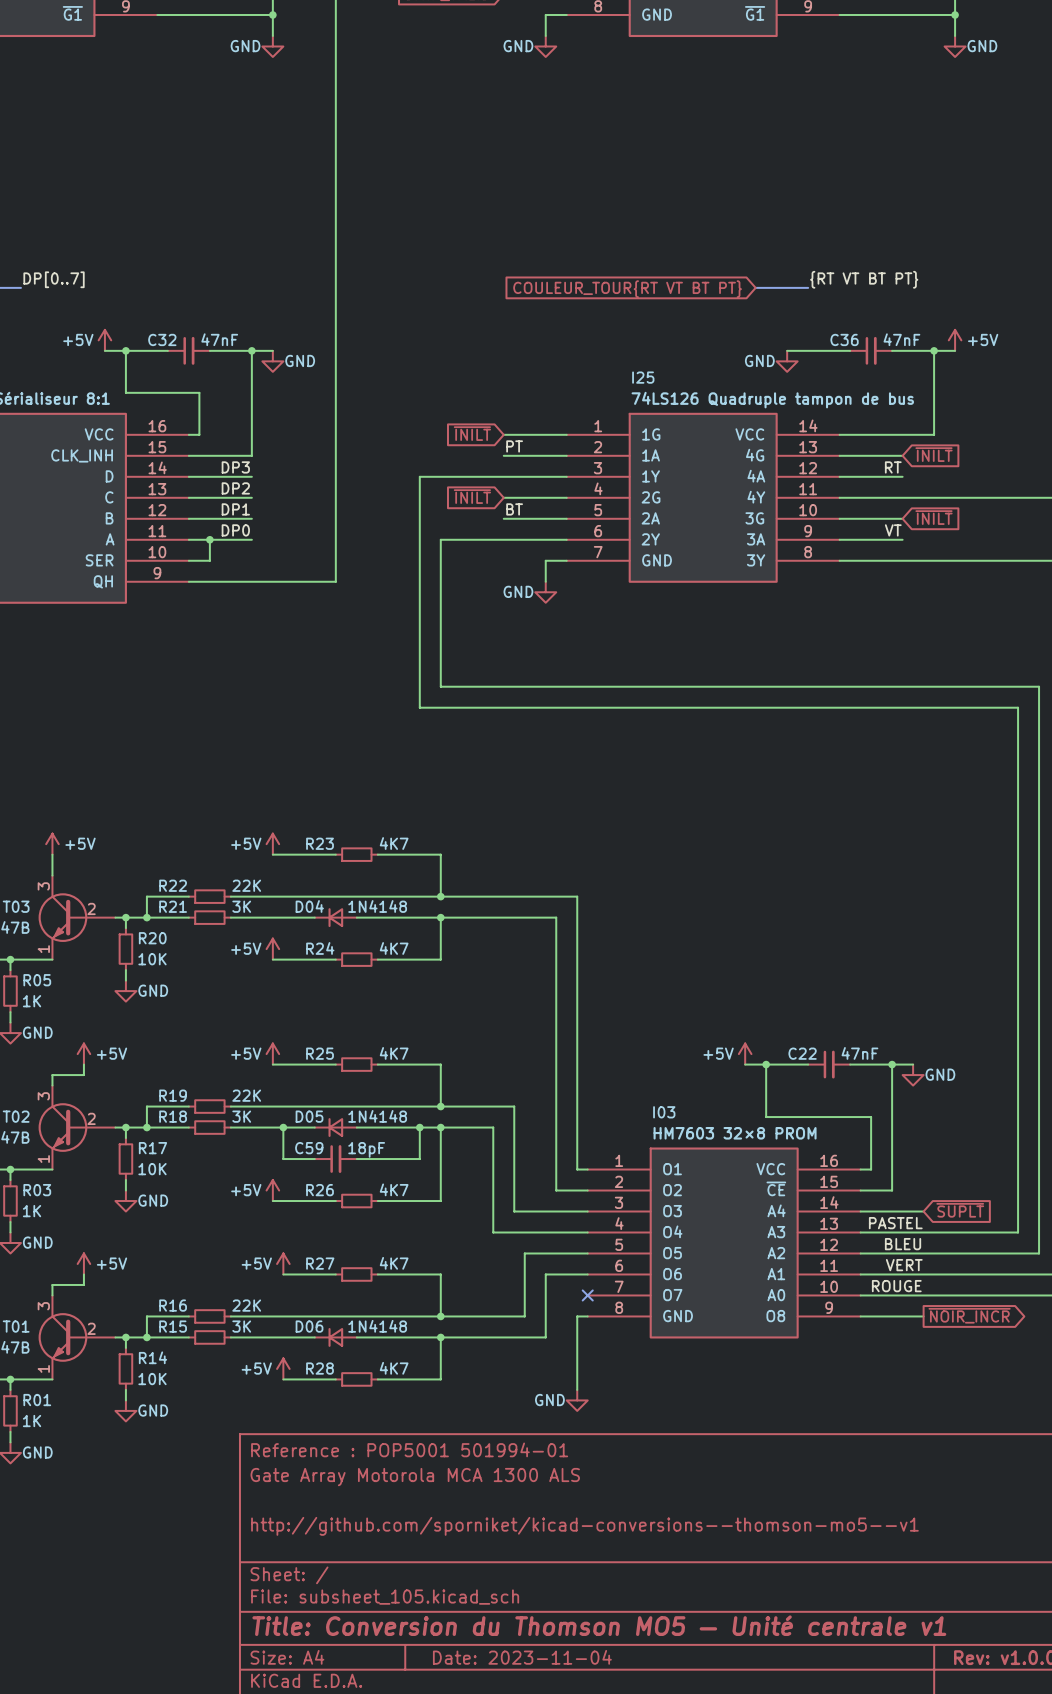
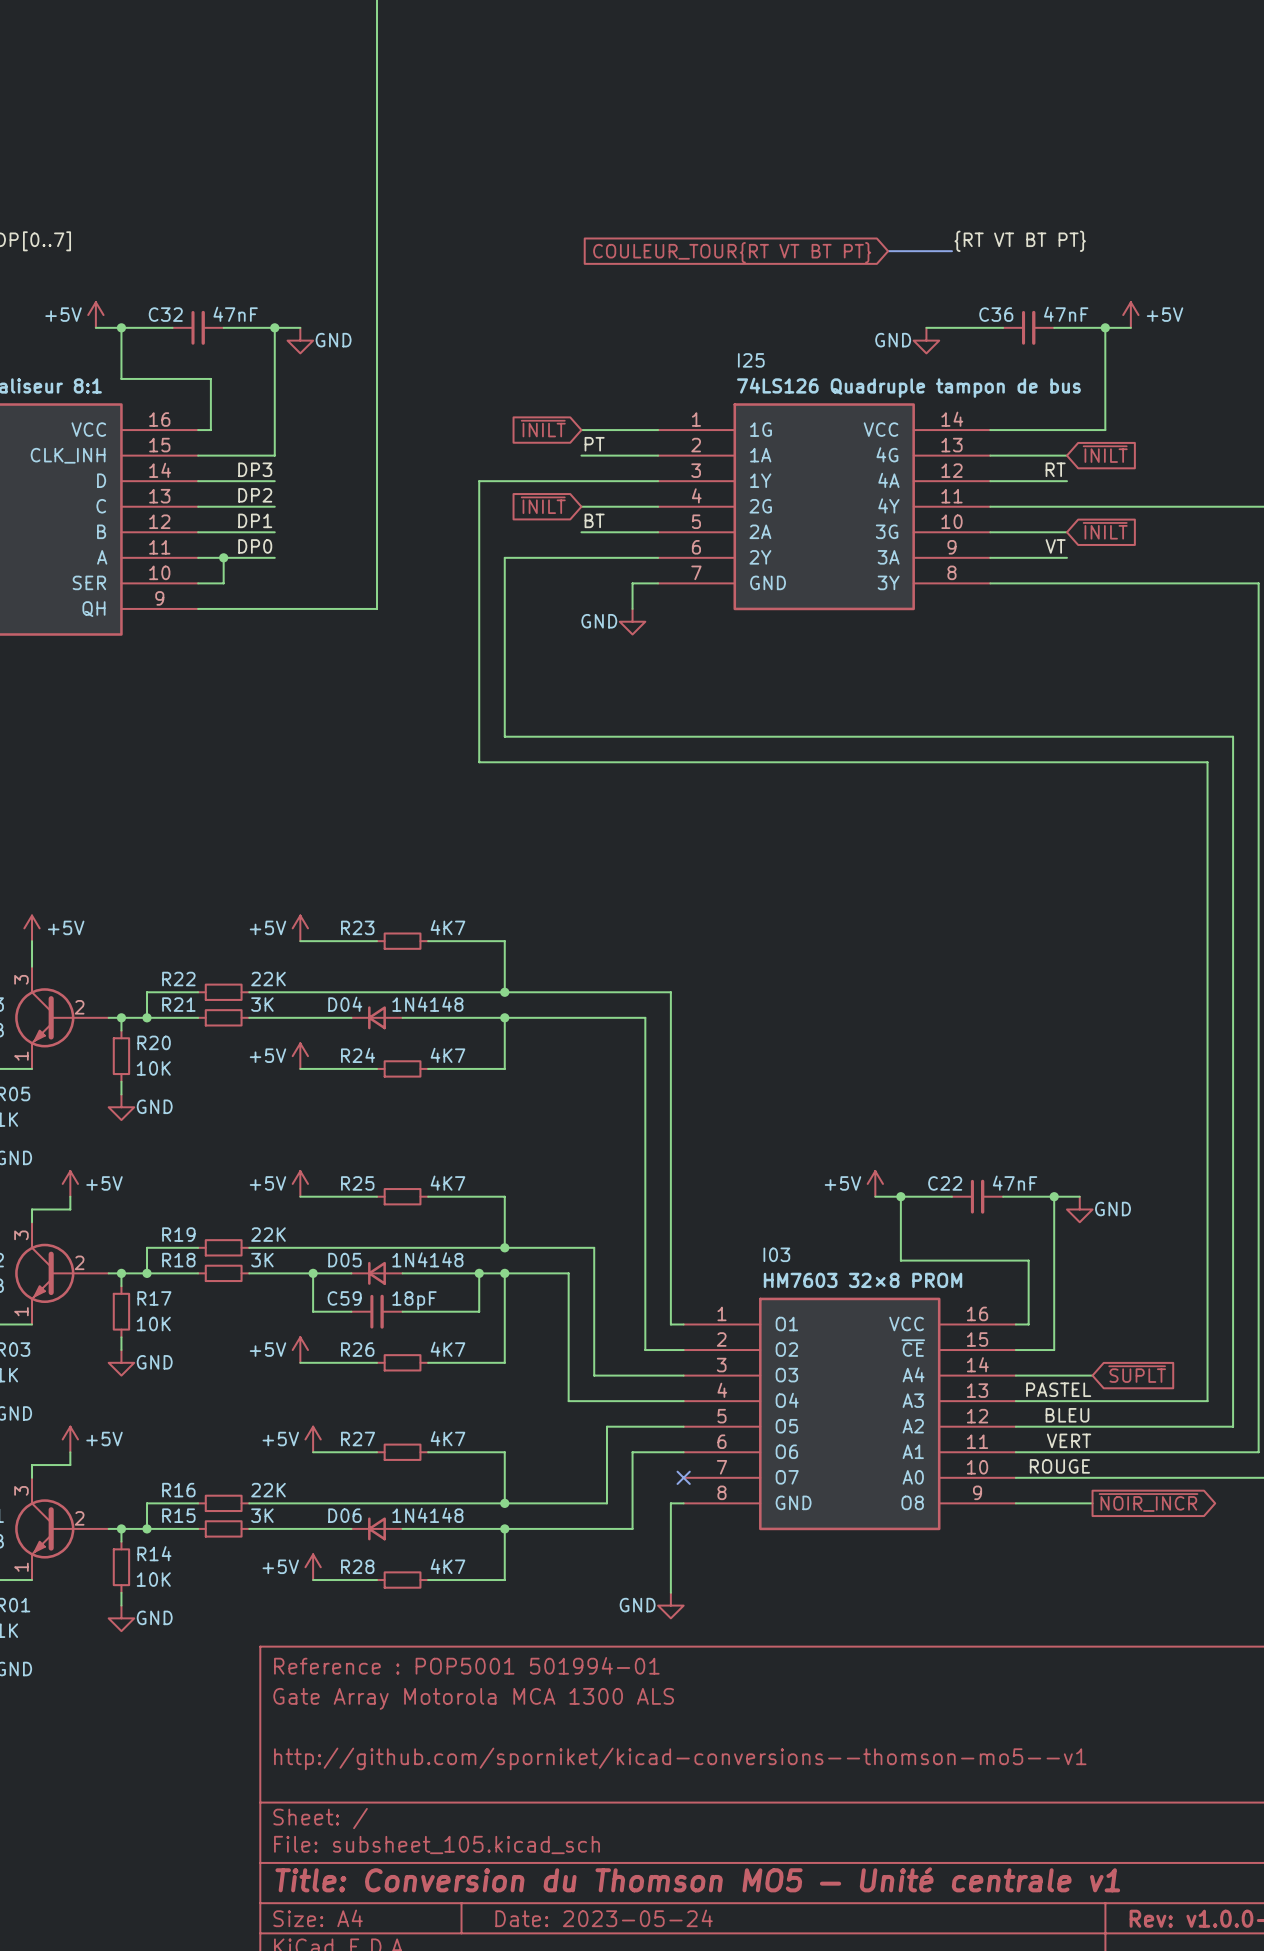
title block: Date: 2023-11-04 (522, 1657) -> Date: 2023-05-24 (604, 1918)

